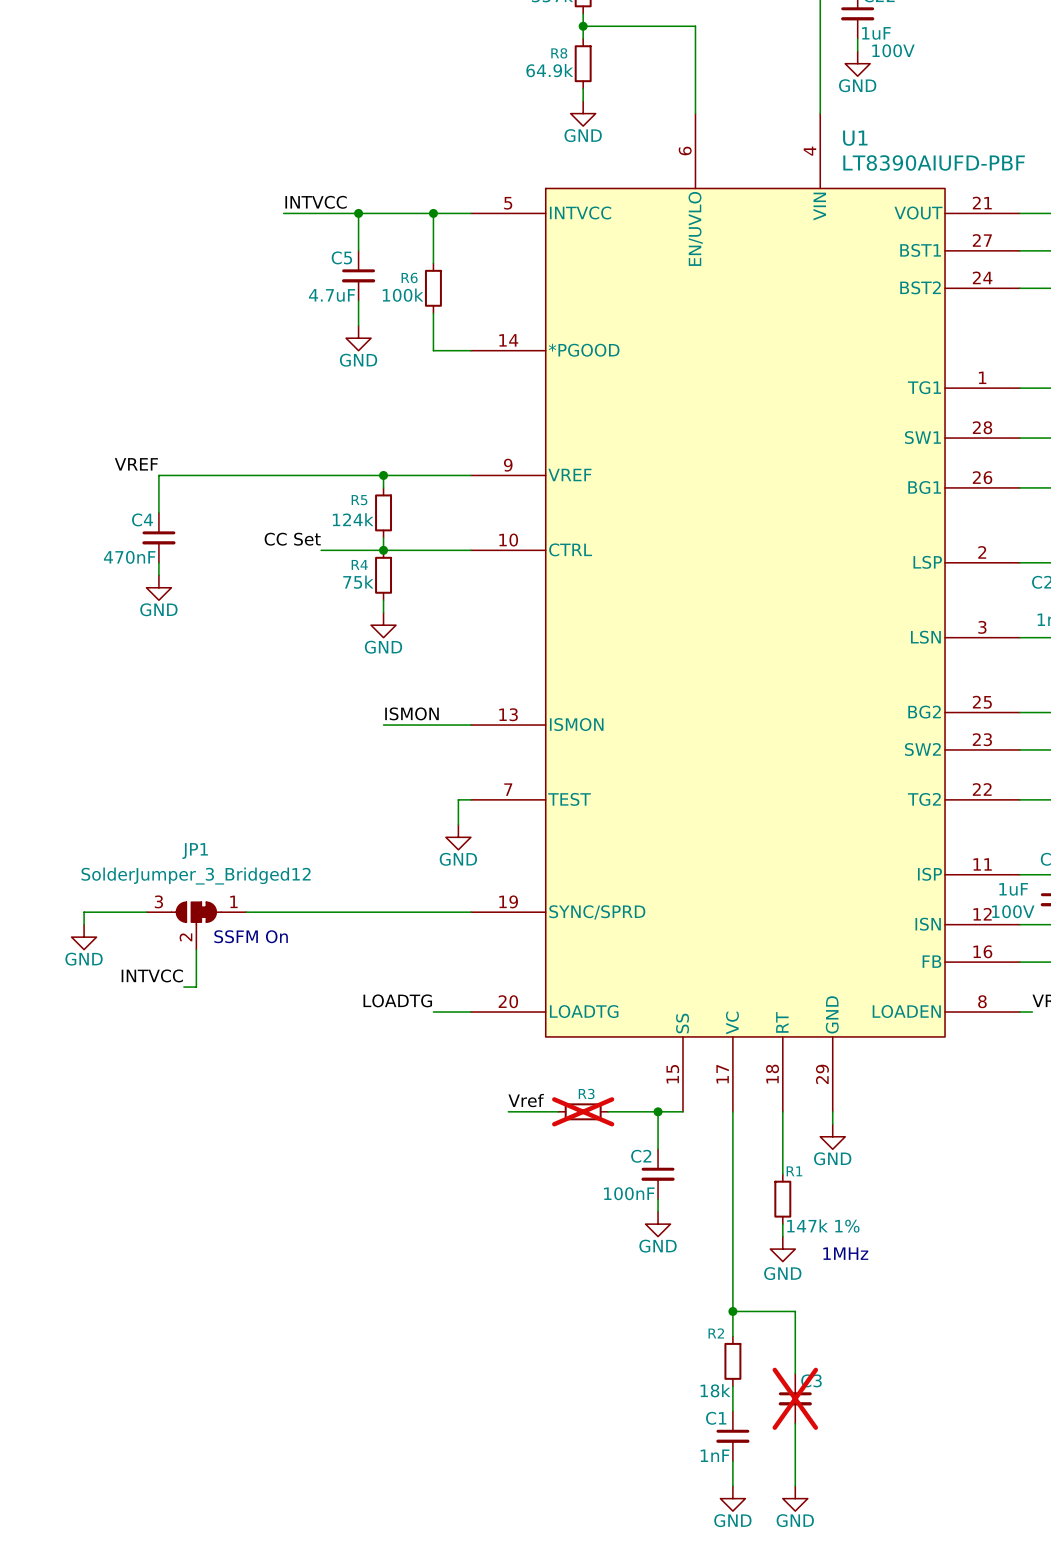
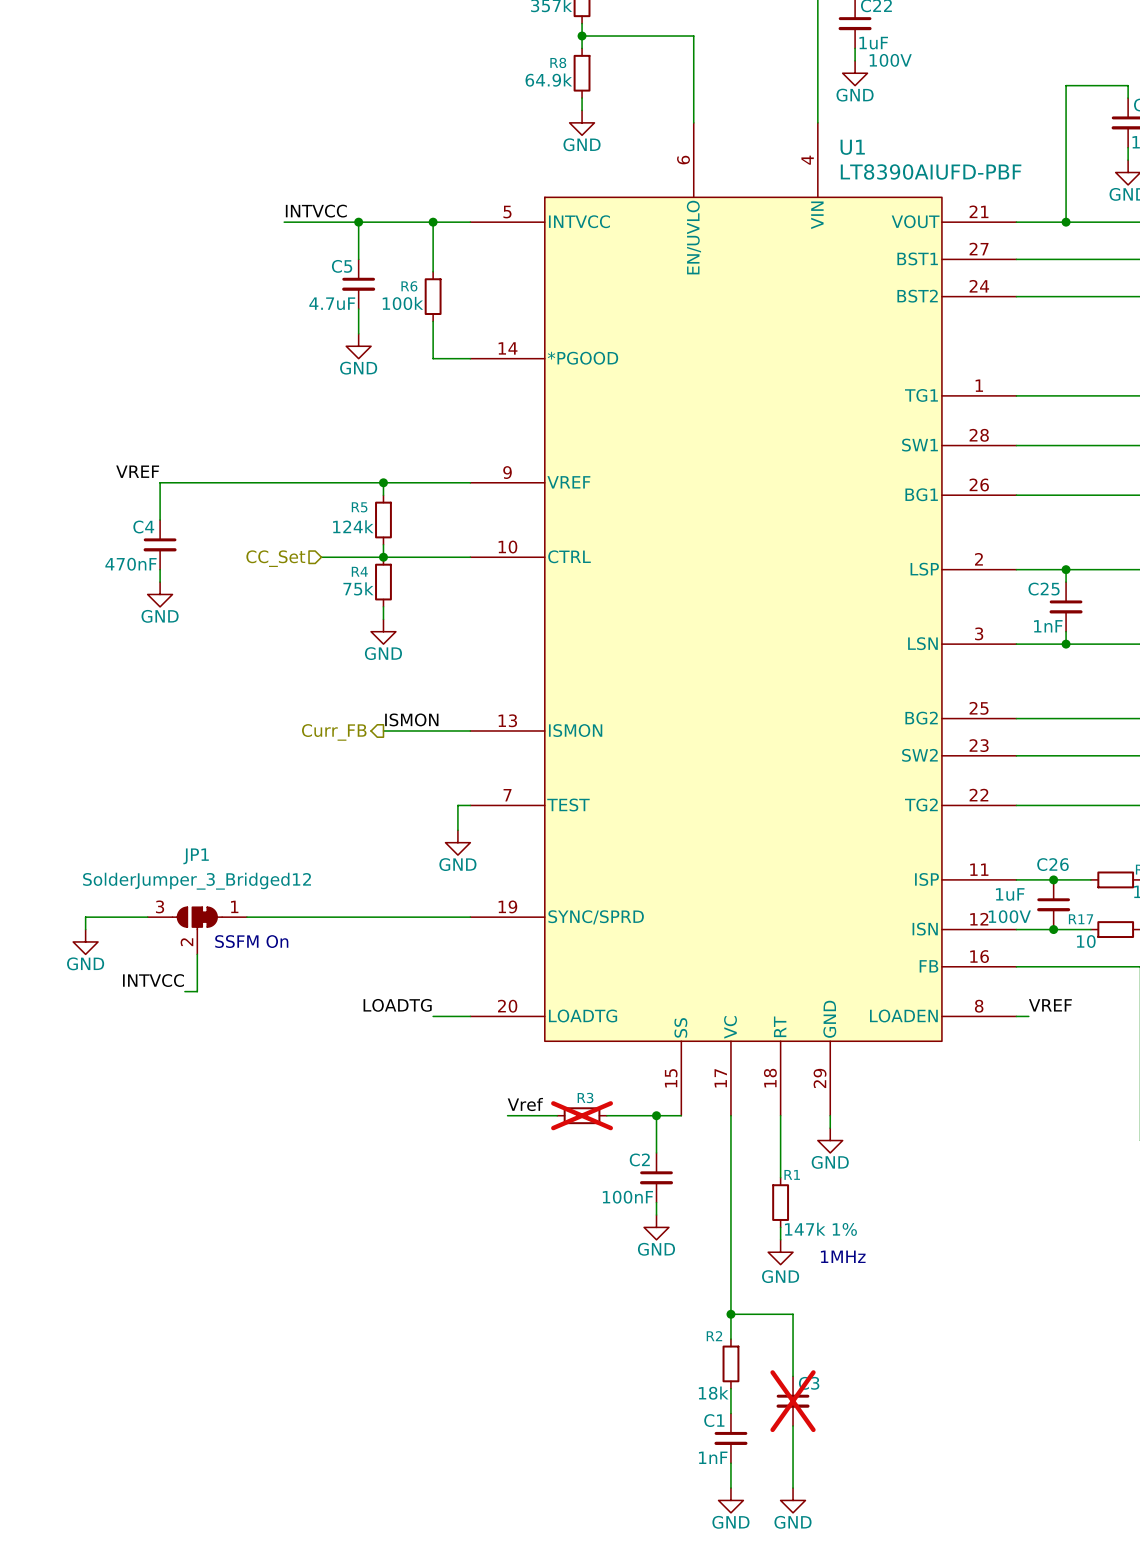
label: CC Set (292, 539) -> none
hierarchical label: none -> CC_Set (275, 558)
hierarchical label: none -> Curr_FB (334, 732)

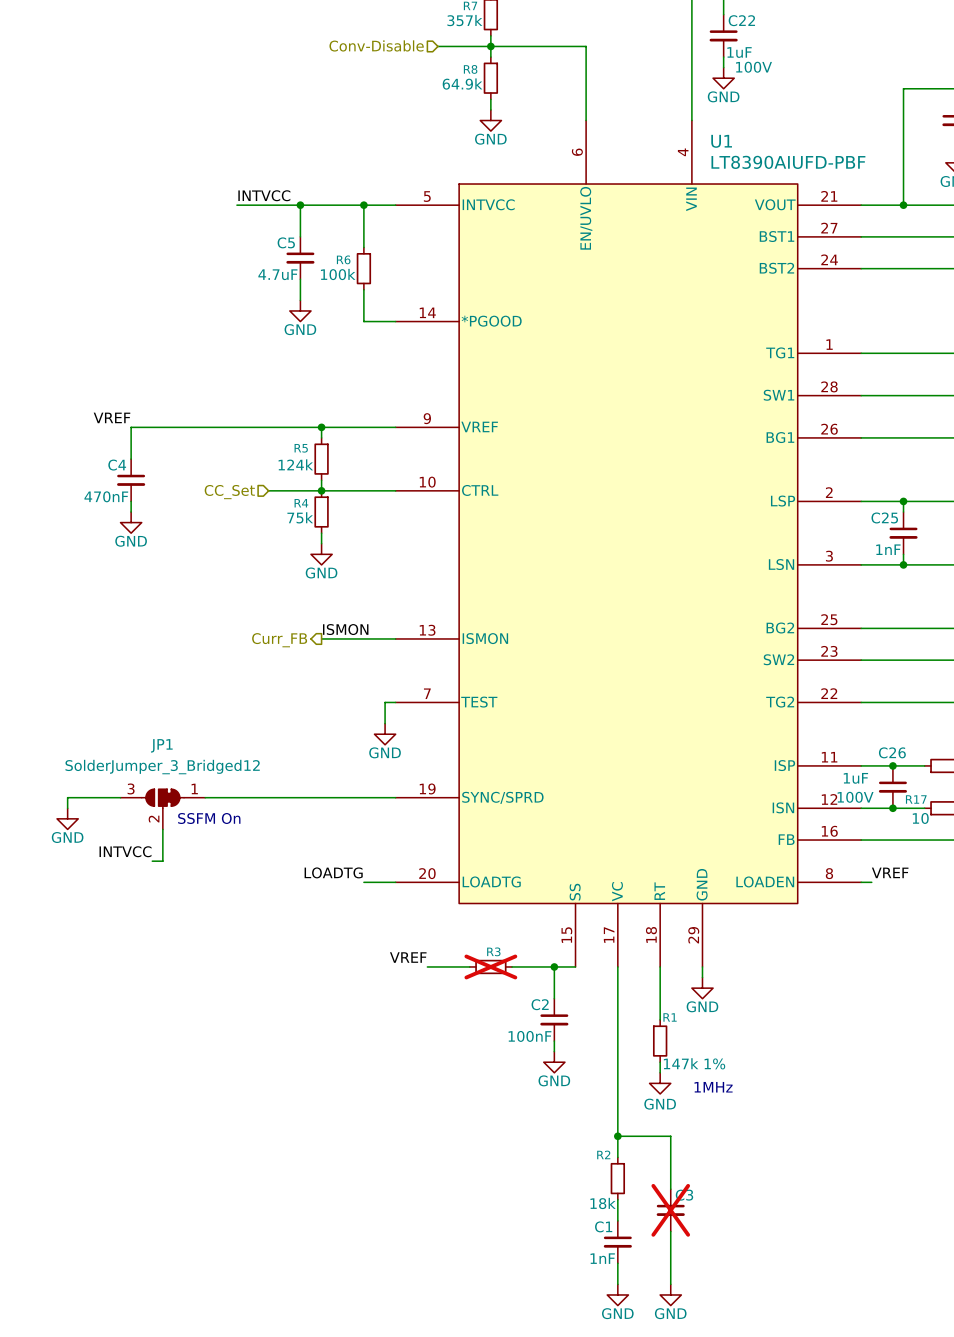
hierarchical label: none -> Conv-Disable (376, 45)
wire: none -> (437, 46) (490, 46)
label: Vref (525, 1104) -> VREF (408, 957)

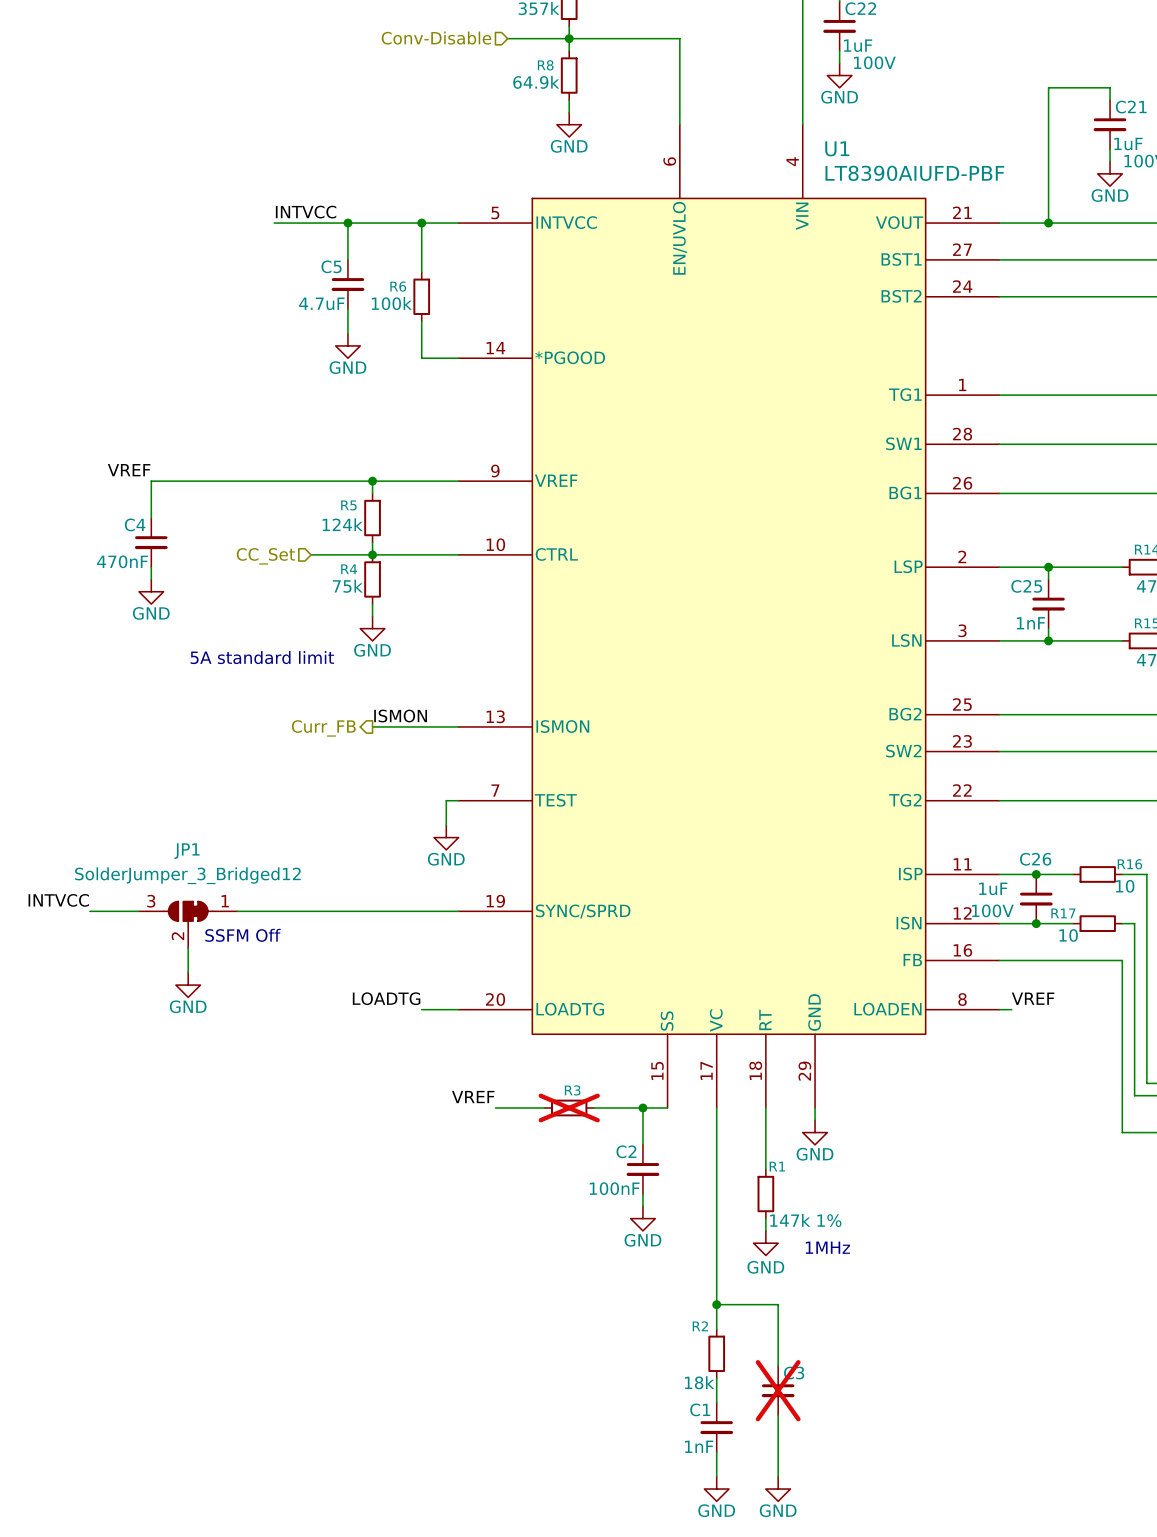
text: none -> 5A standard limit (262, 657)
wire: (78, 797) (67, 797) (67, 808) -> none
power symbol position: GND (67, 818) -> GND (188, 985)
text: SSFM On (209, 818) -> SSFM Off (242, 935)
label position: INTVCC (125, 851) -> INTVCC (58, 900)

